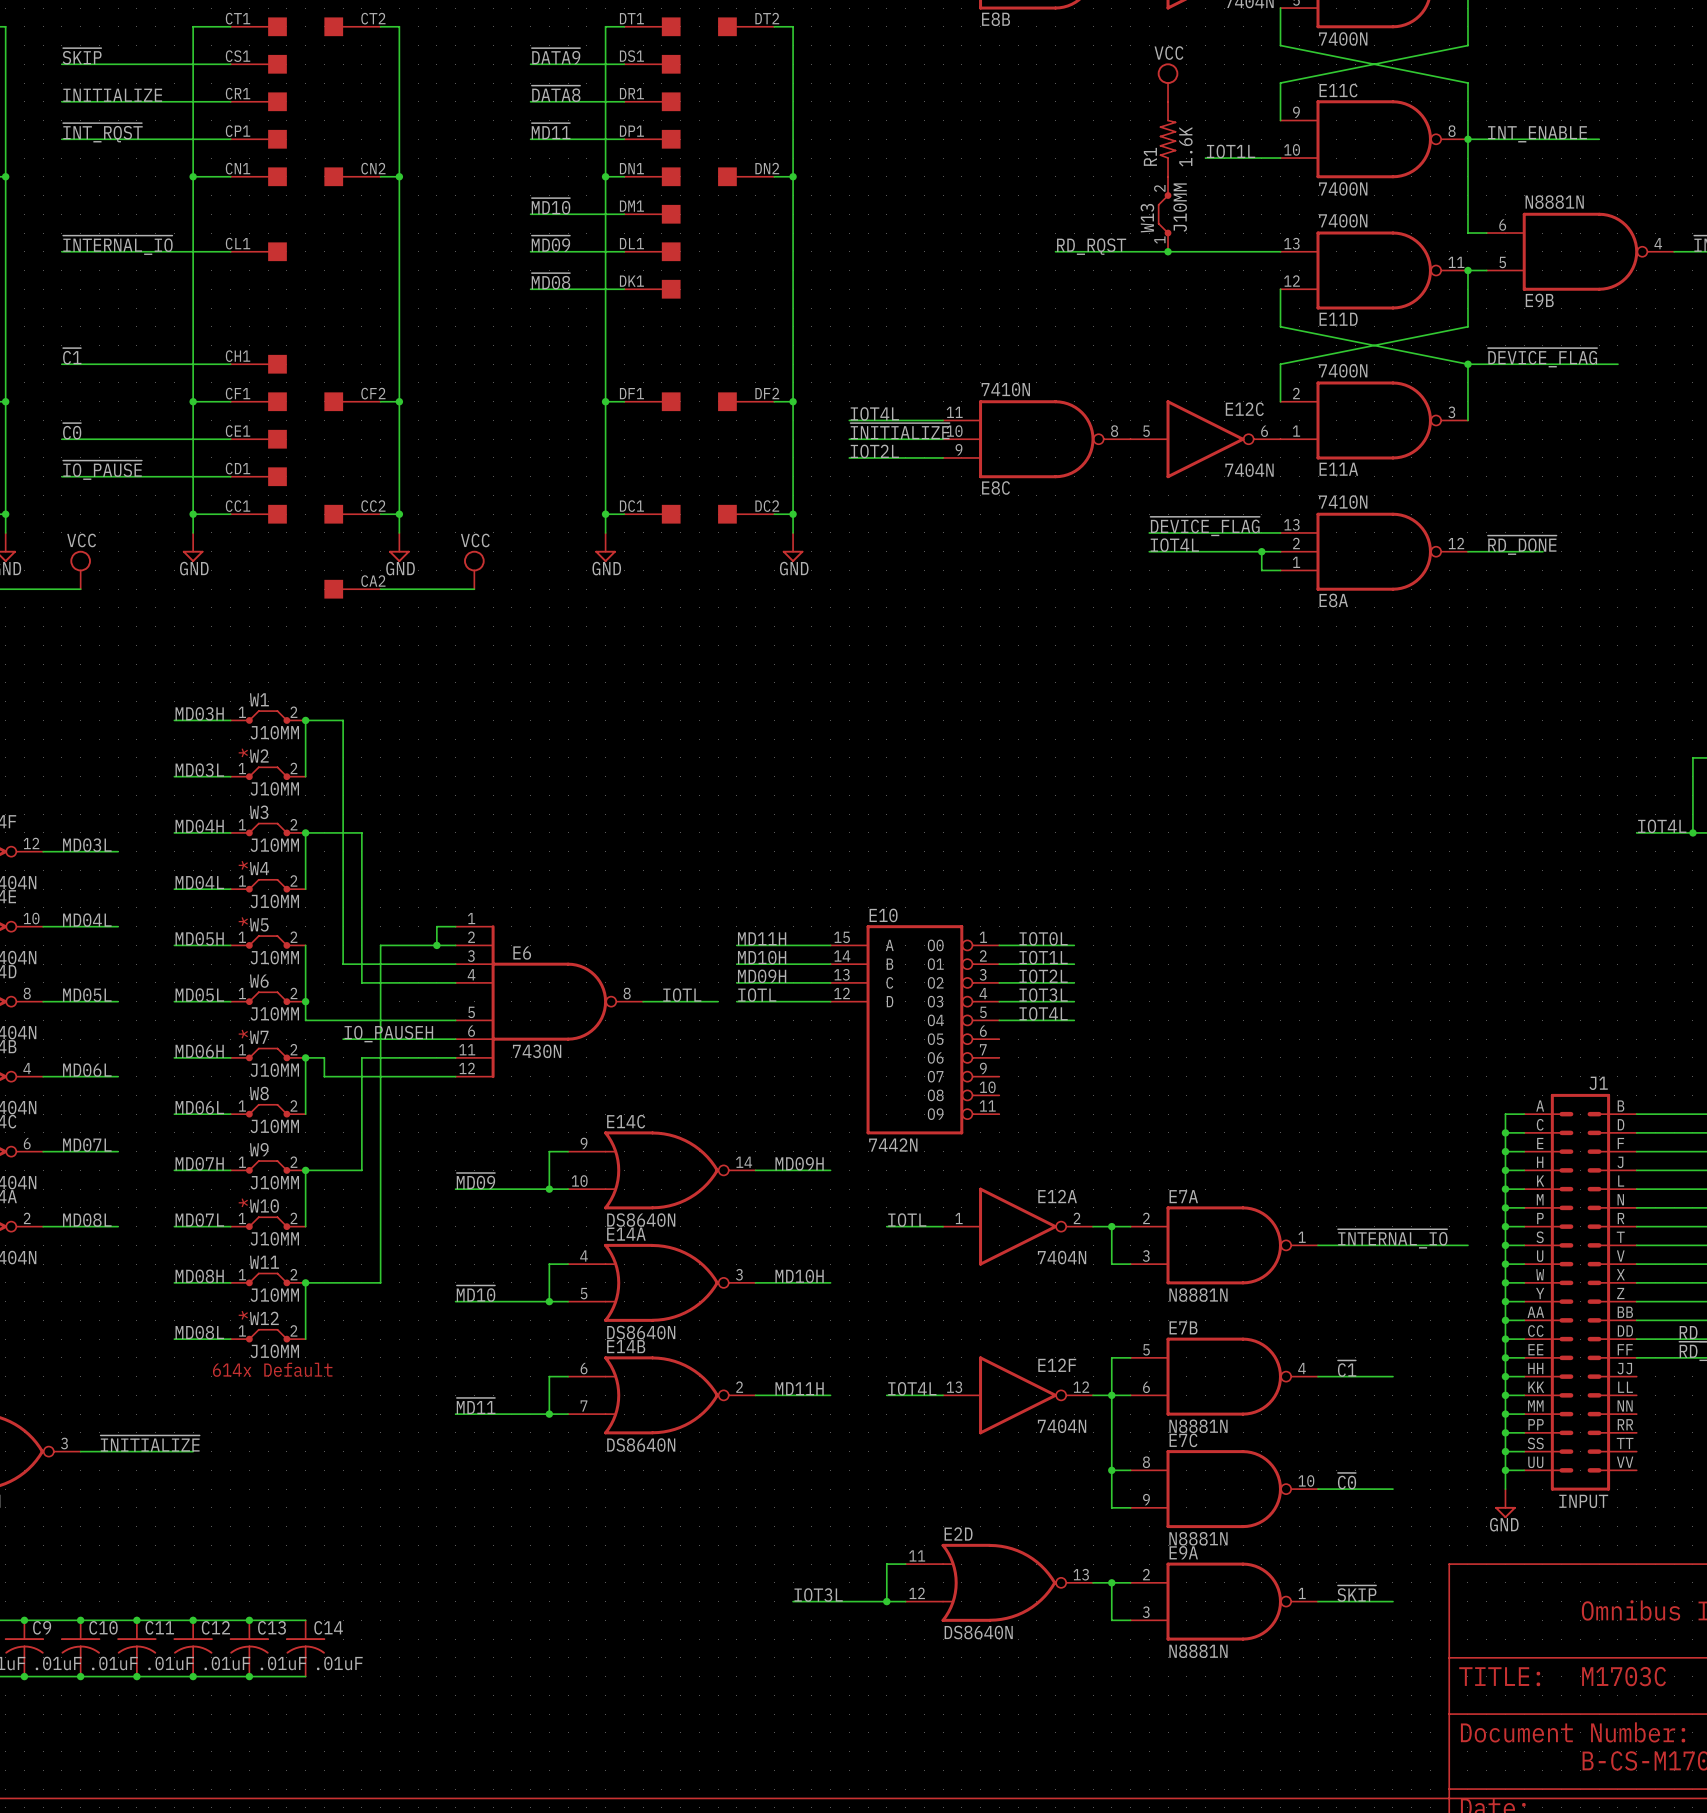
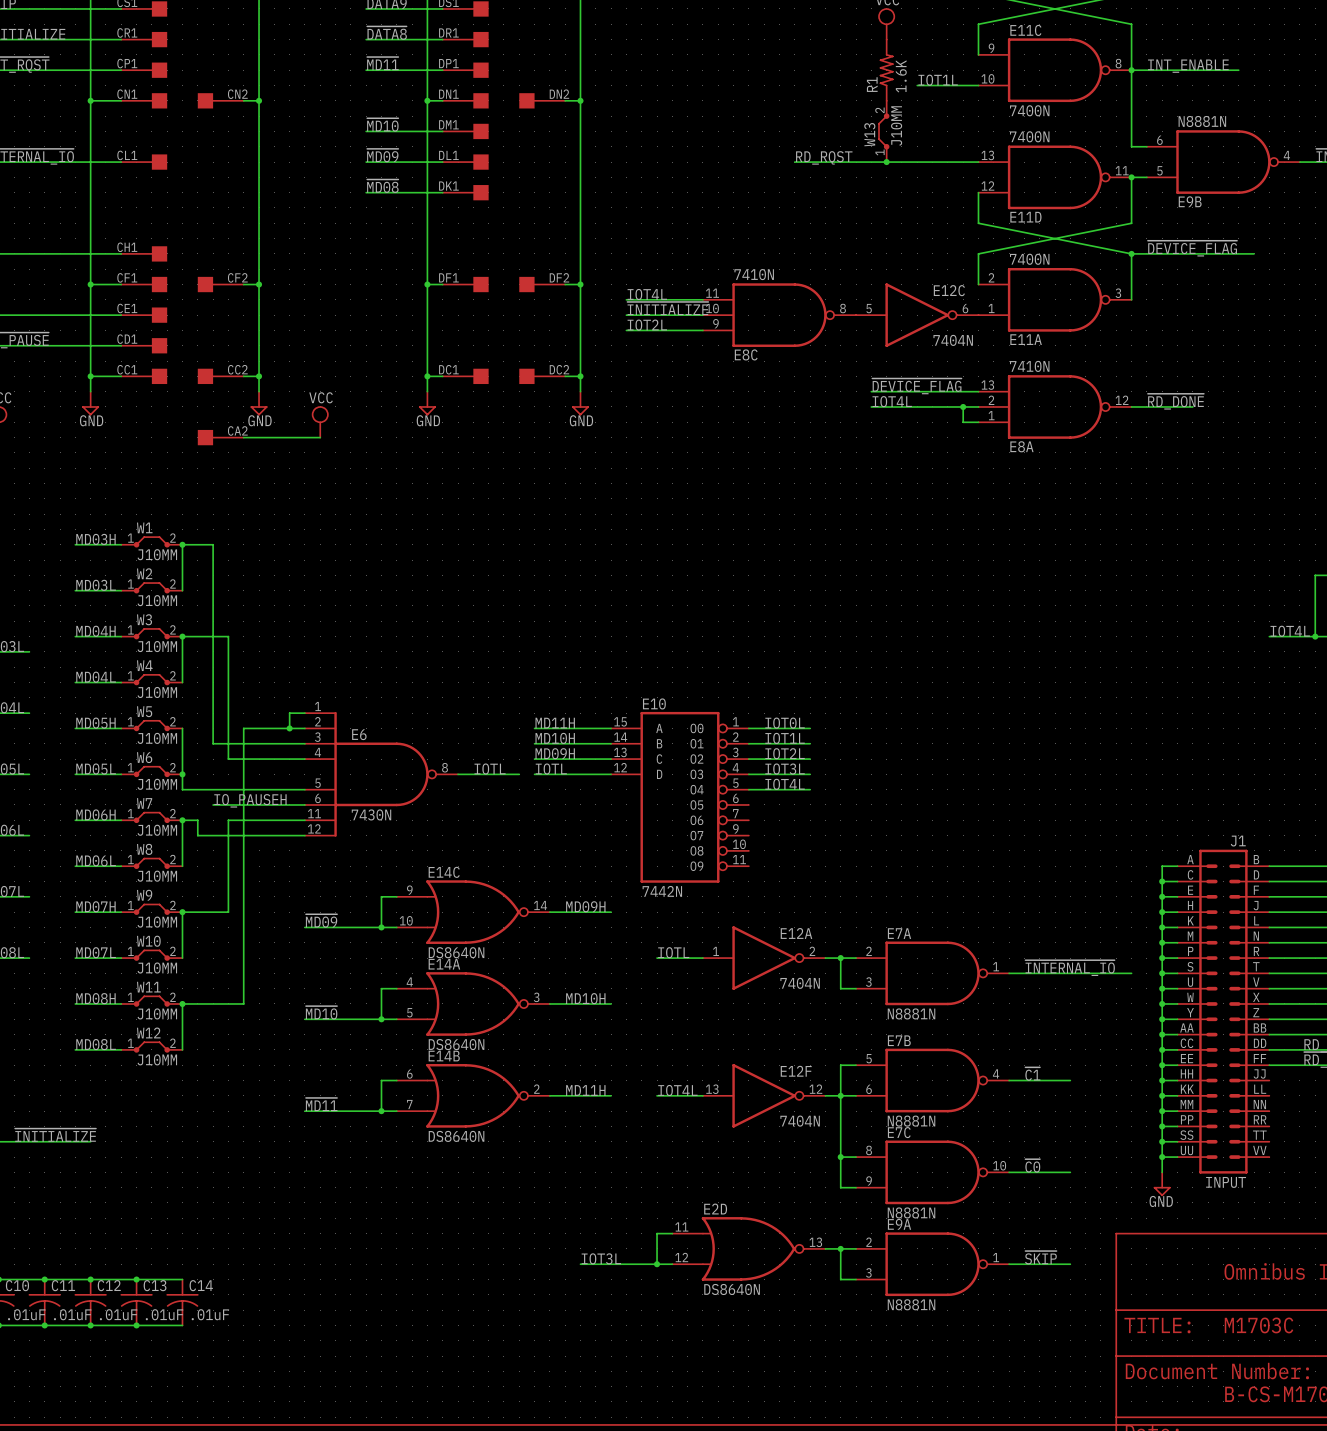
text: * (243, 752) -> none
text: * (243, 865) -> none
text: * (243, 921) -> none
text: * (243, 1034) -> none
text: * (243, 1202) -> none
text: * (243, 1315) -> none
text: 614x Default (272, 1369) -> none

